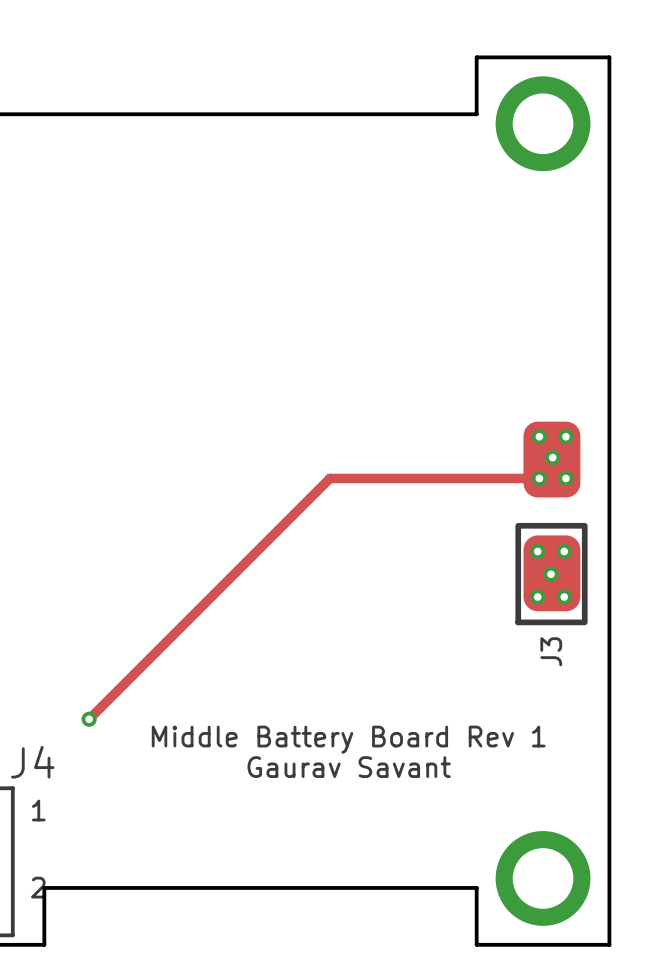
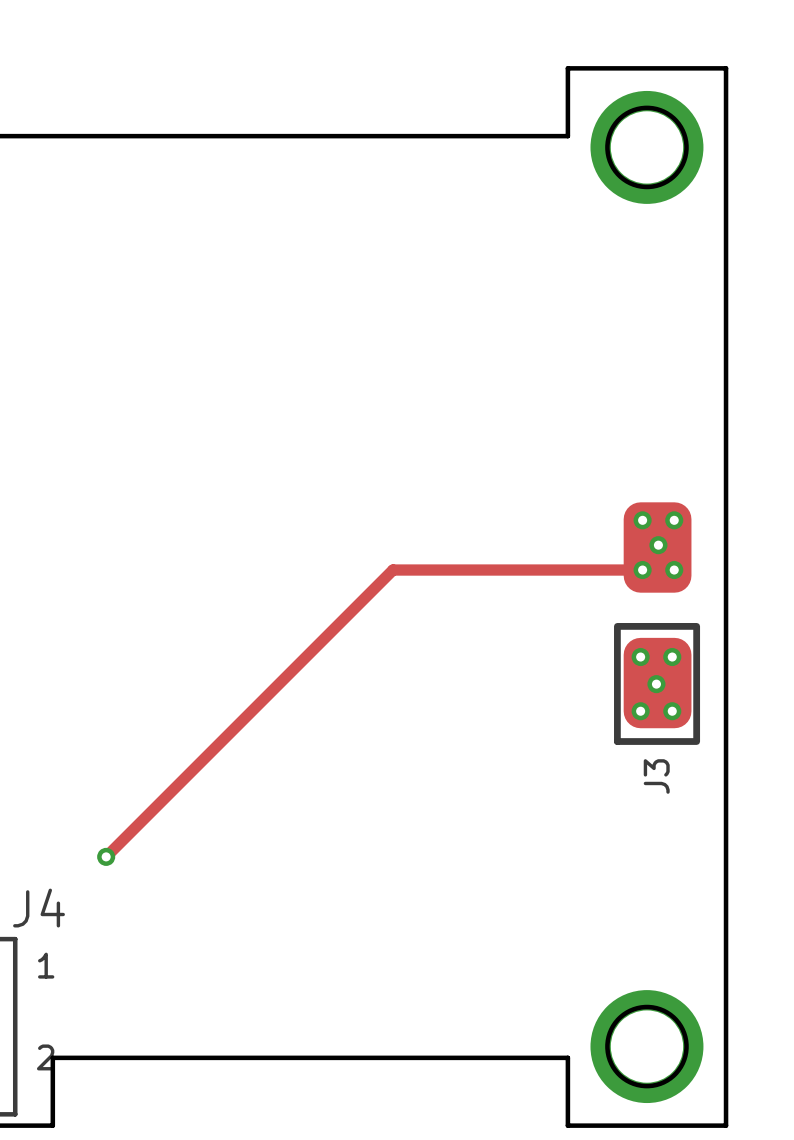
round board edge: none -> [605, 105, 689, 190]
text: Middle Battery Board Rev 1 (348, 739) -> none
text: Gaurav Savant (349, 767) -> none
round board edge: none -> [605, 1004, 689, 1089]

